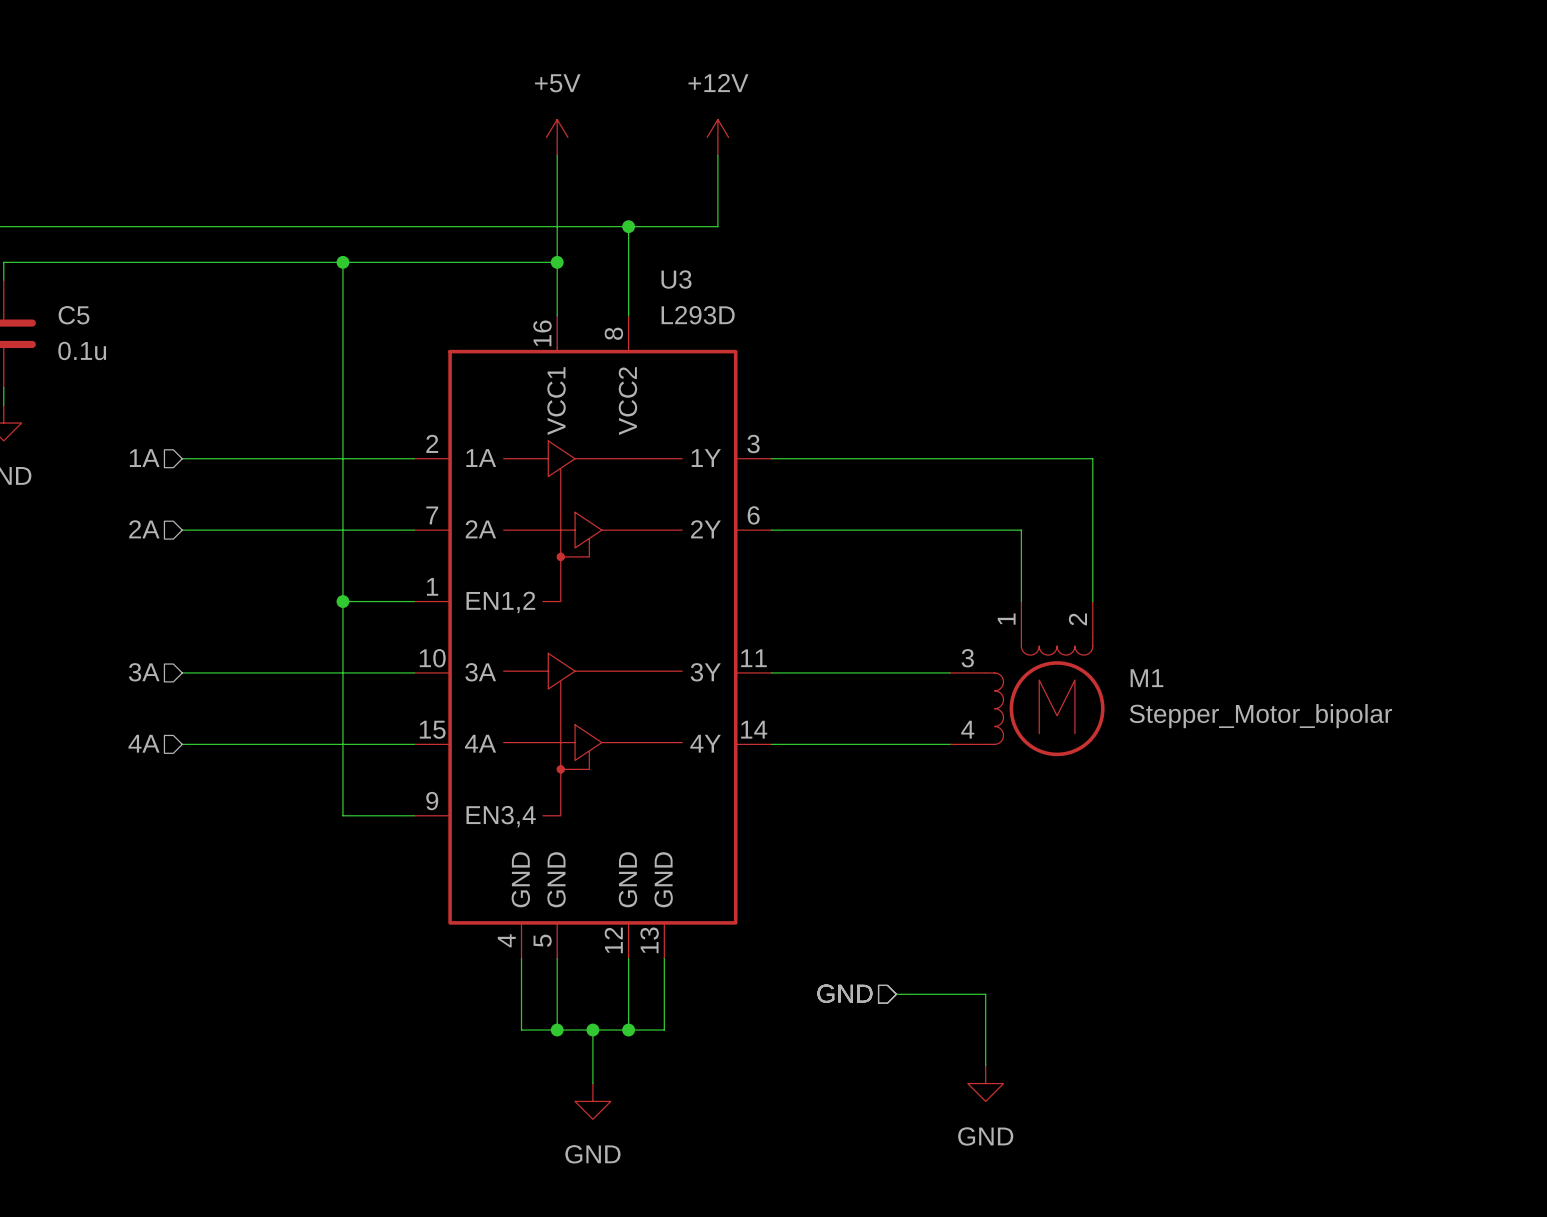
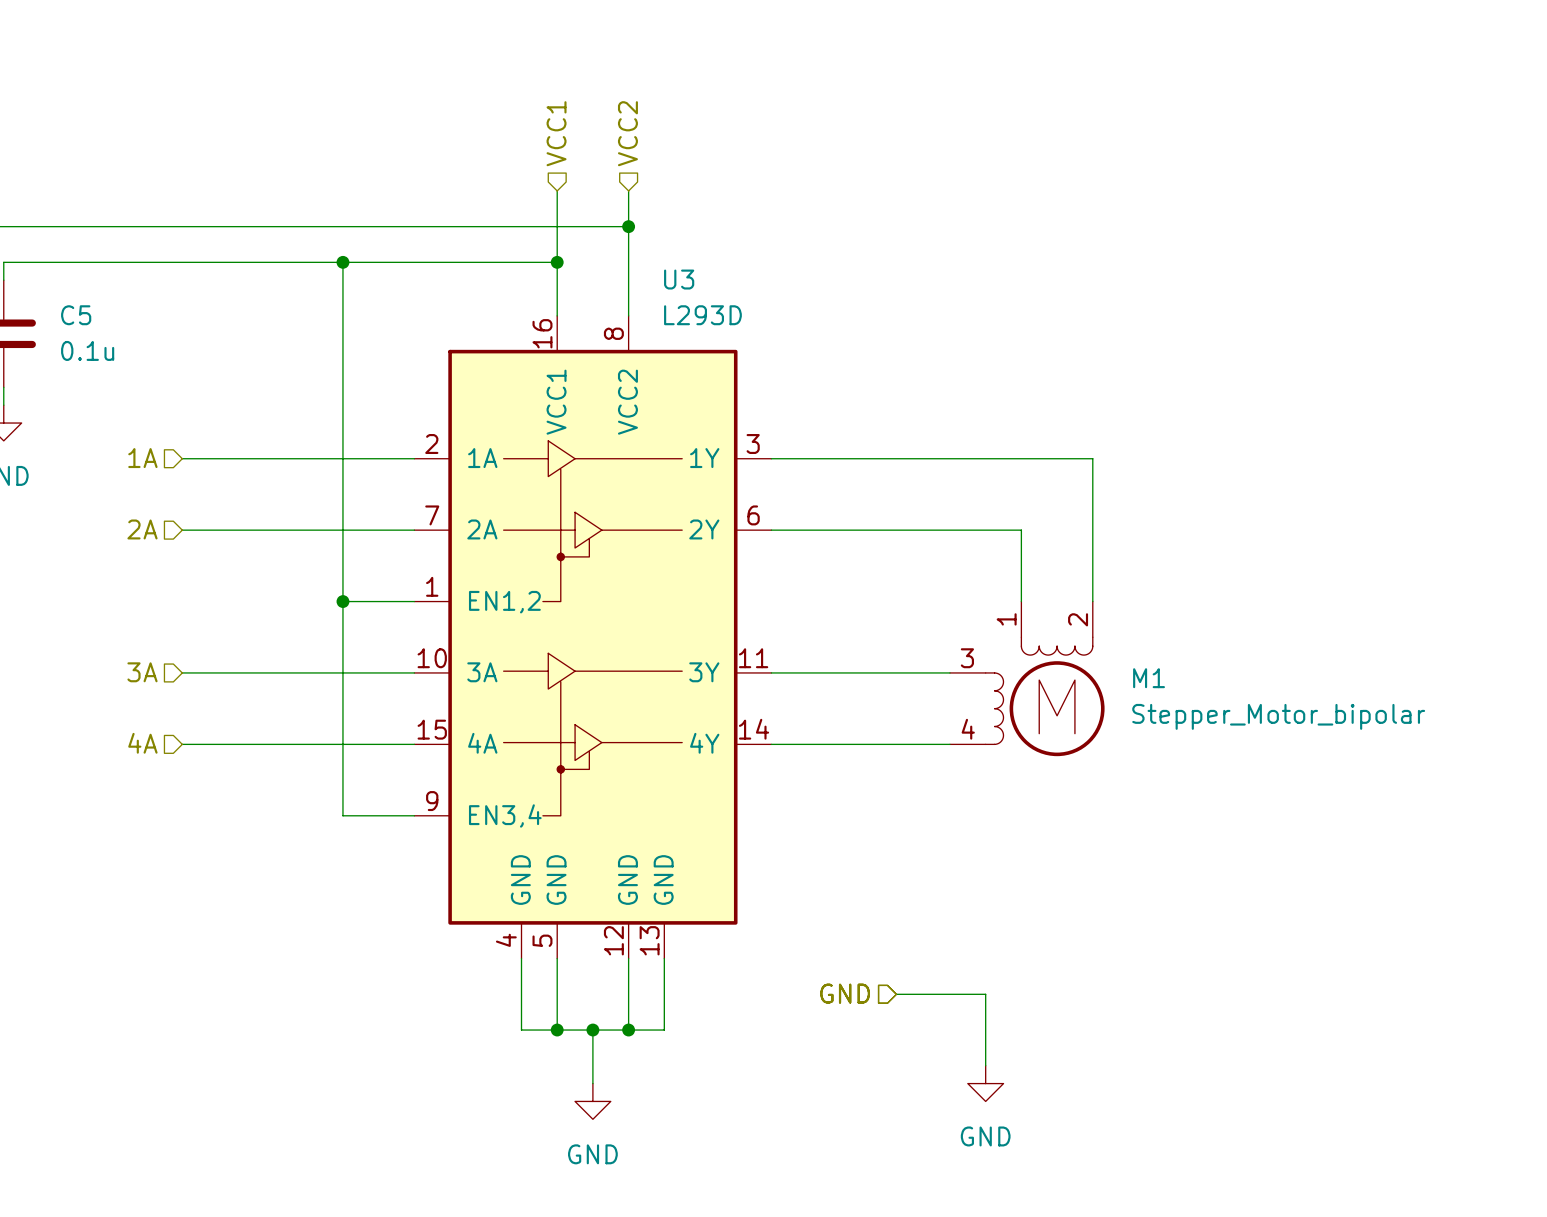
hierarchical label: none -> VCC1 (556, 133)
hierarchical label: none -> VCC2 (627, 133)
power symbol: +5V (557, 137) -> none
power symbol: +12V (717, 137) -> none
wire: (557, 155) (557, 190) -> none
wire: (717, 155) (717, 226) (628, 226) -> (628, 190) (628, 226)

